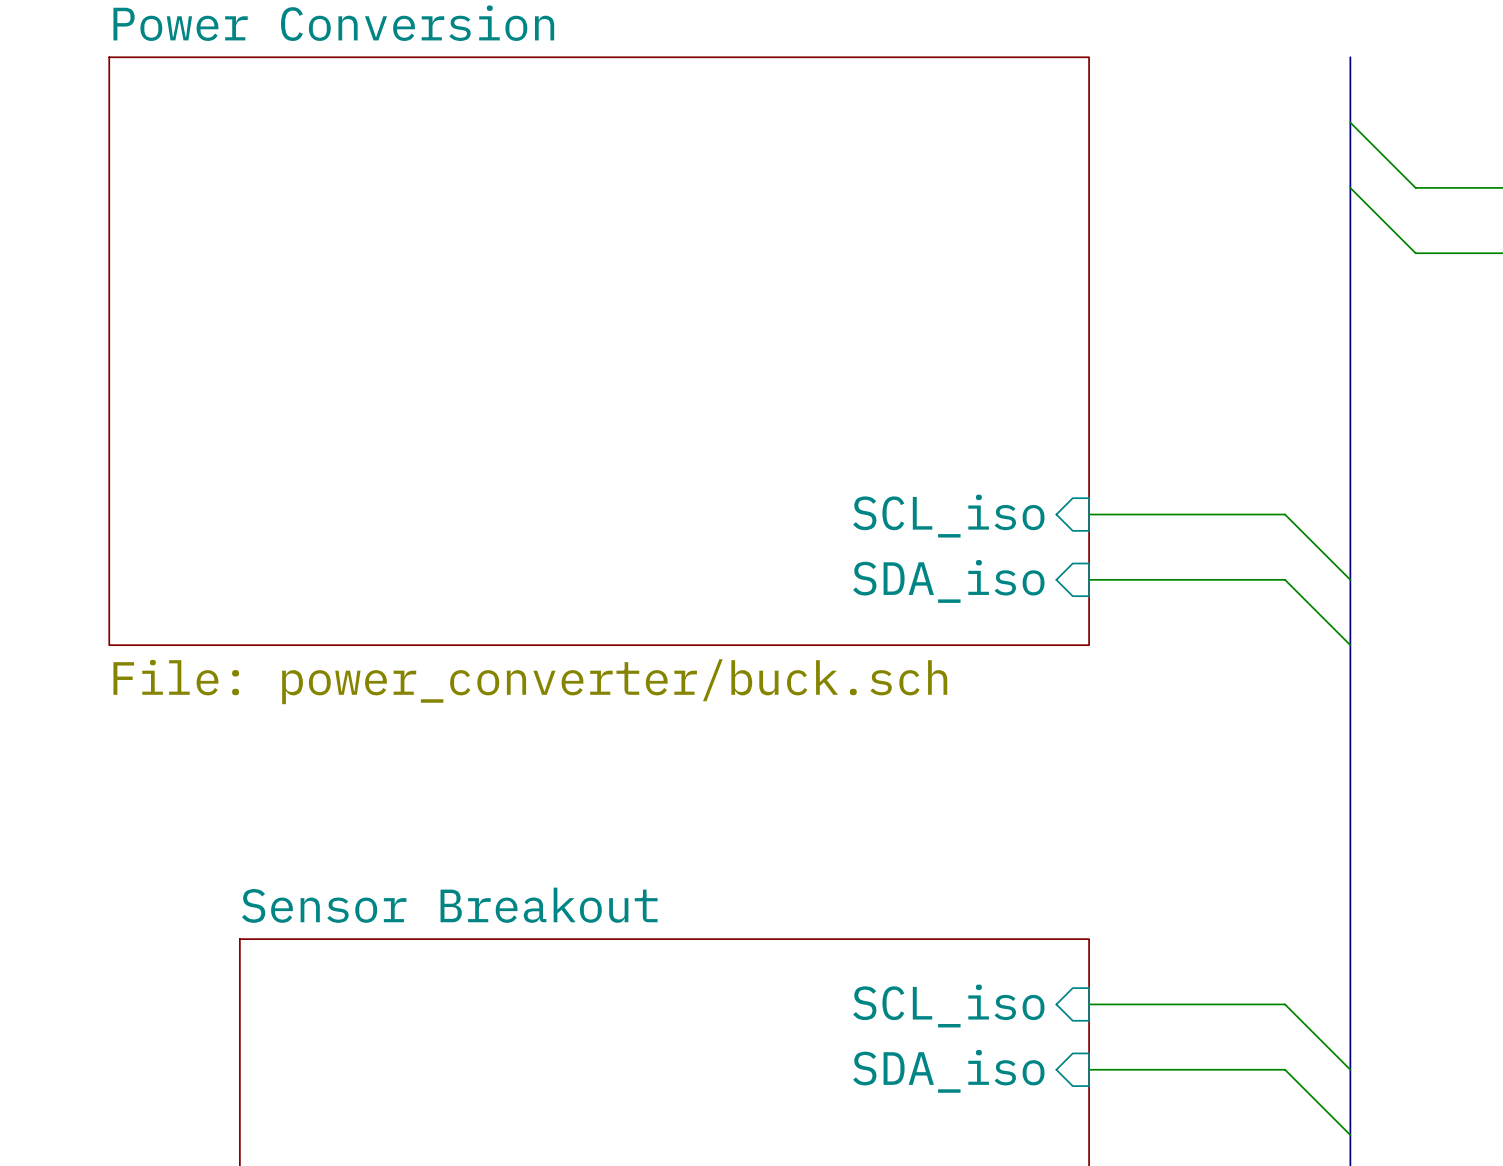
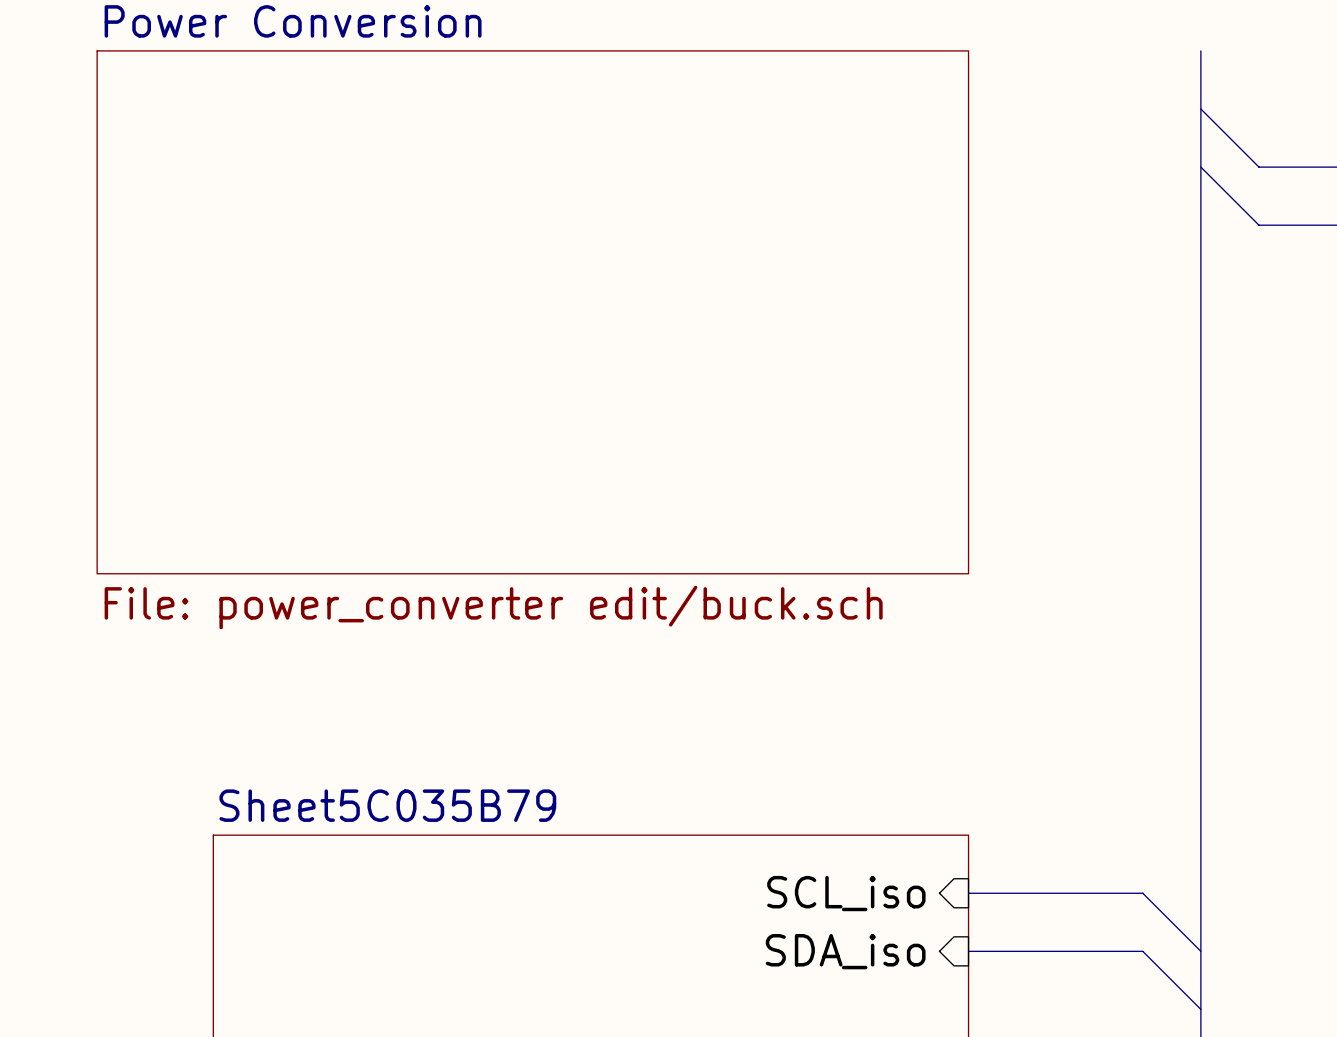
wire: (1089, 514) (1285, 514) (1350, 579) -> none
sheet pin: SCL_iso (948, 516) -> none
wire: (1089, 579) (1285, 579) (1350, 645) -> none
sheet pin: SDA_iso (948, 581) -> none
sheet Power Conversion value: File: power_converter/buck.sch (530, 681) -> File: power_converter edit/buck.sch (493, 607)
sheet Sensor Breakout name: Sensor Breakout (449, 905) -> Sheet5C035B79 (387, 805)

